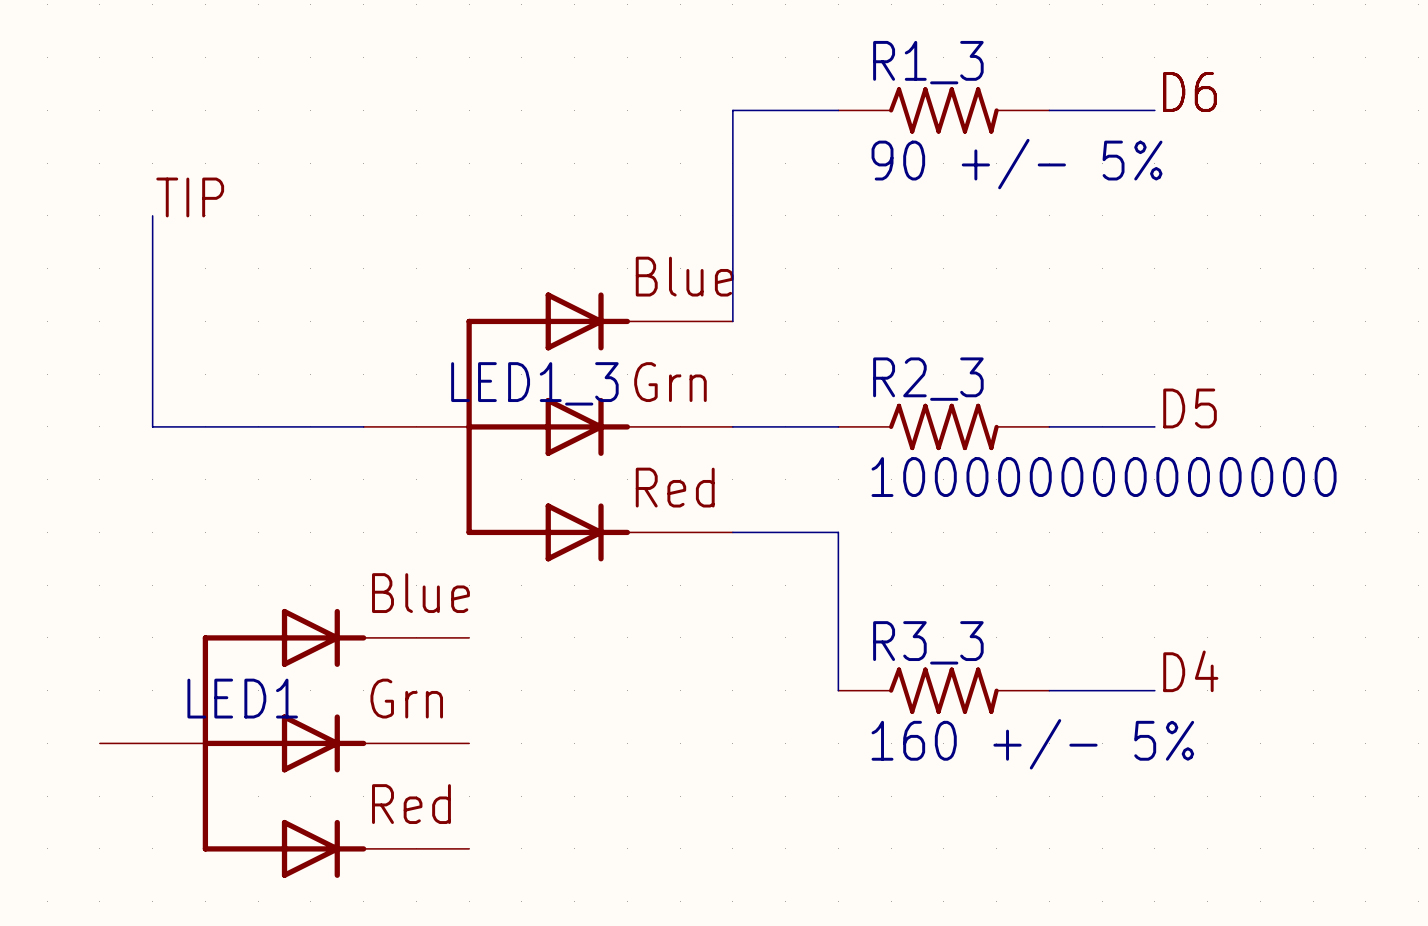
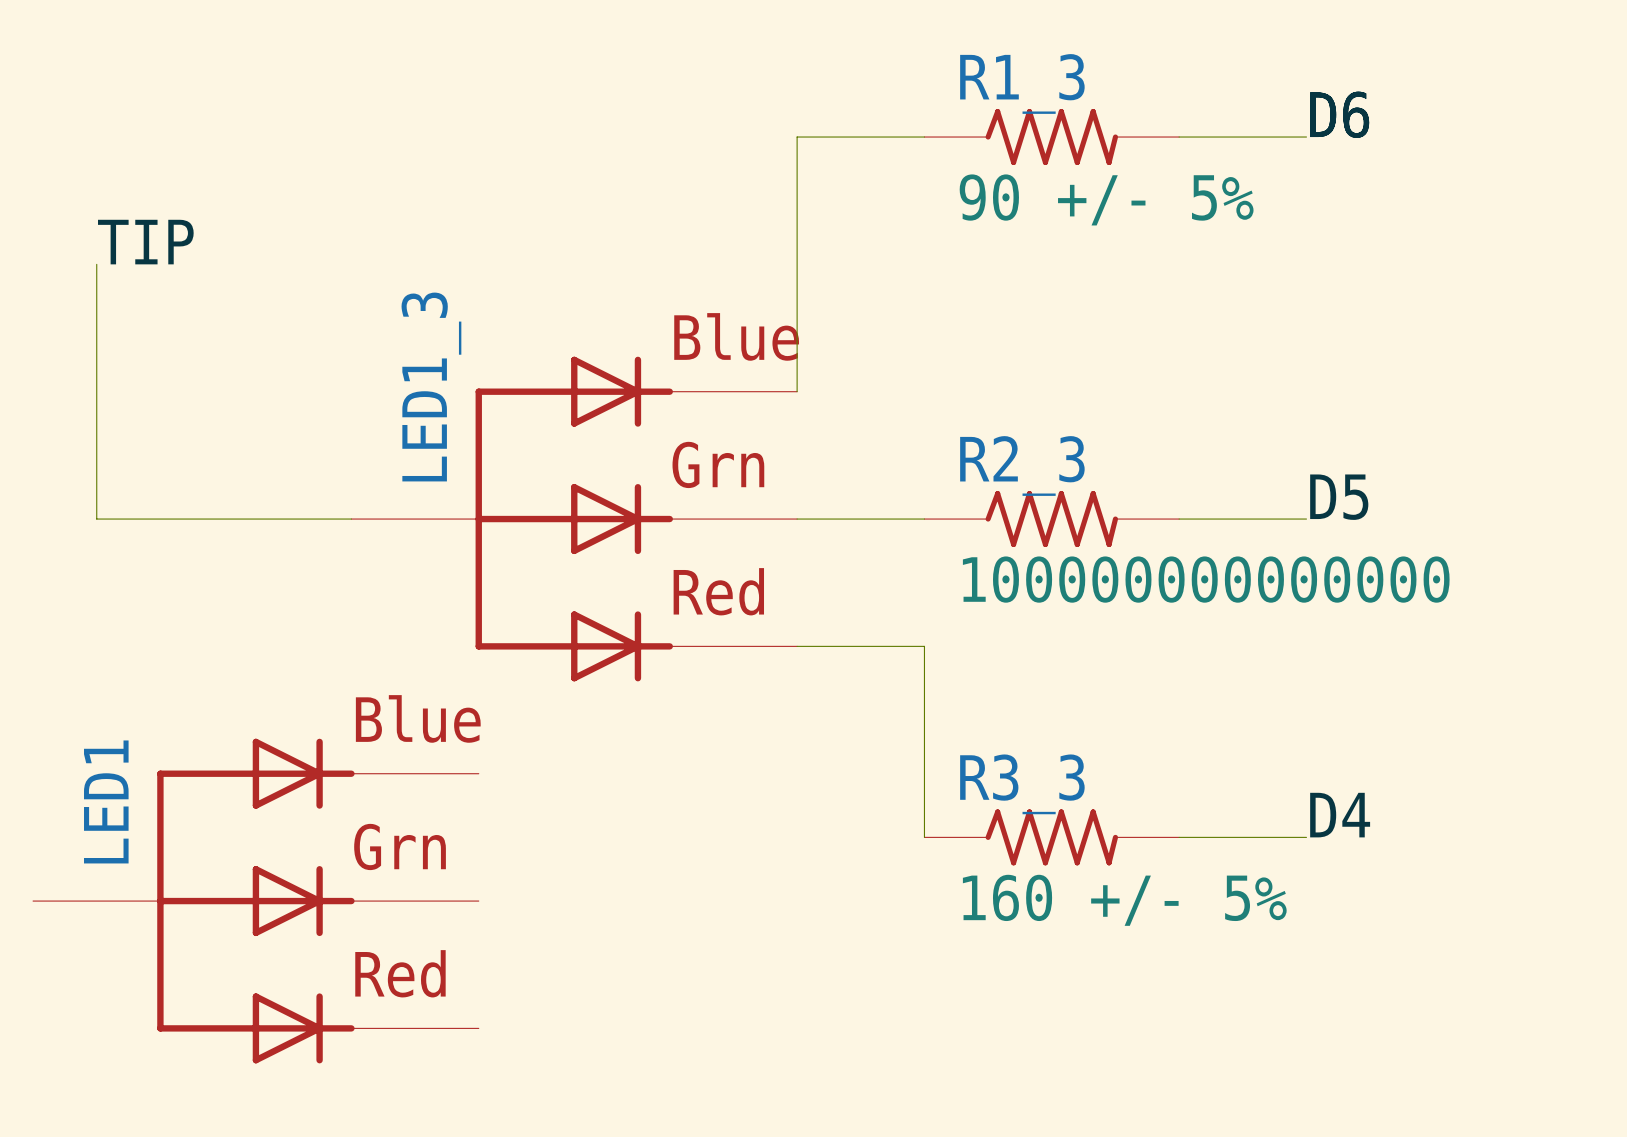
LED1_3 name rotation: 0° (534, 383) -> 90° counterclockwise (431, 387)
LED1 name rotation: 0° (242, 698) -> 90° counterclockwise (106, 801)

